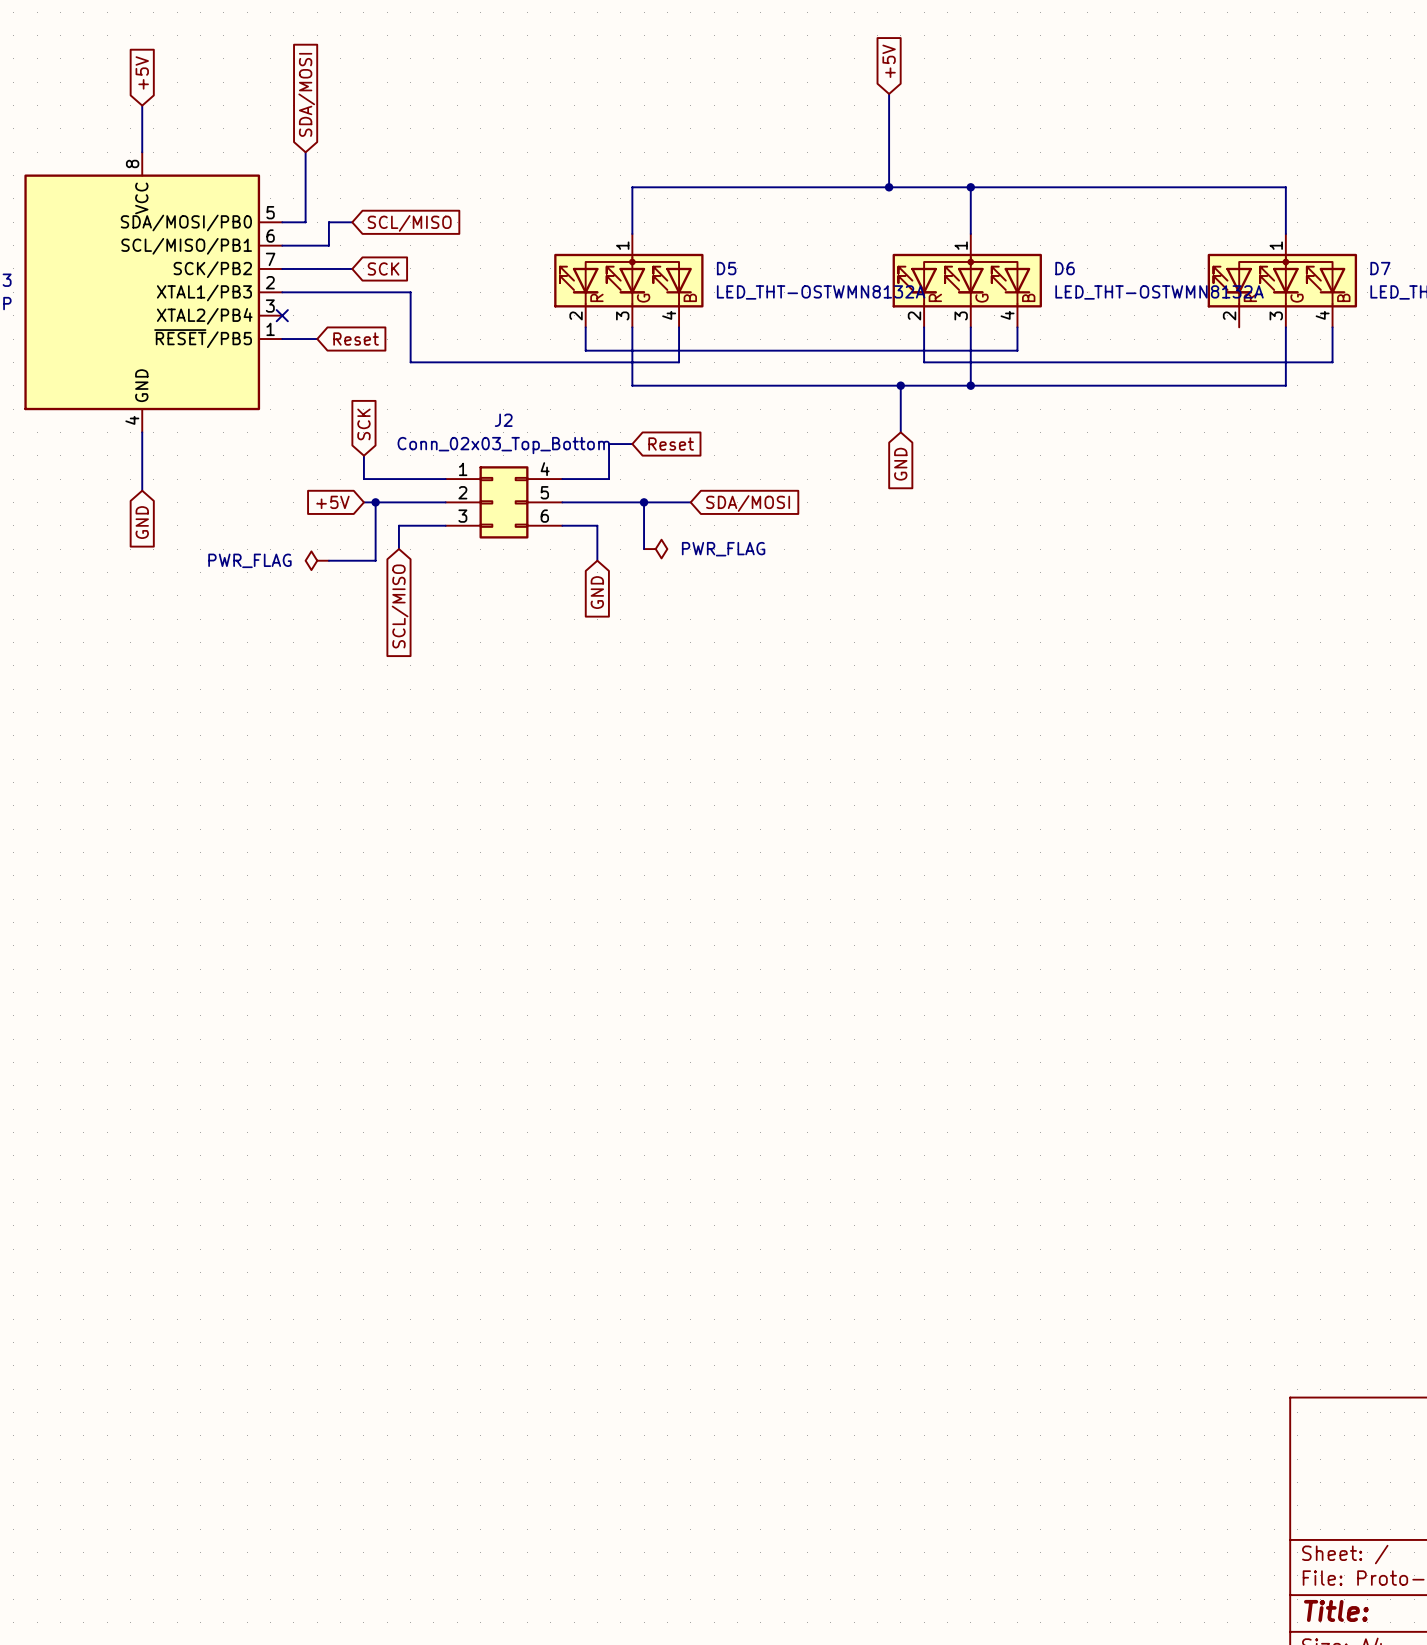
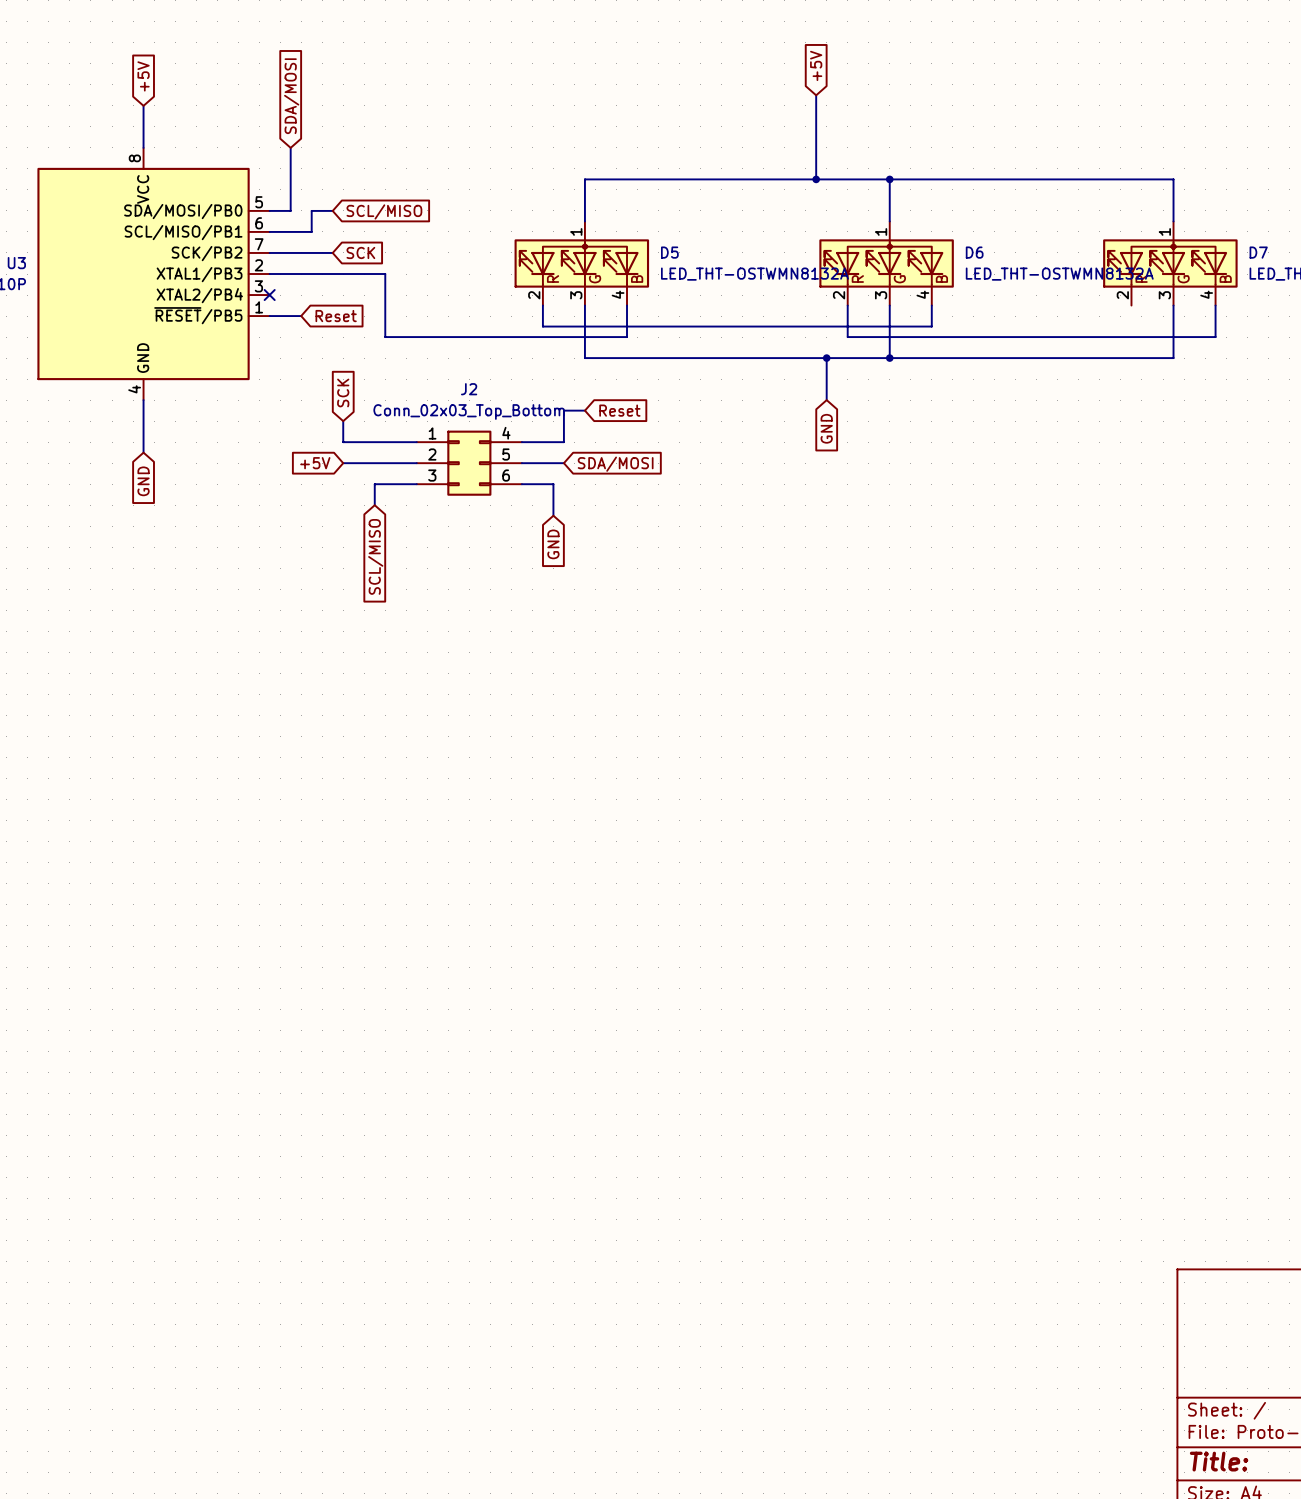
wire: (375, 502) (375, 560) (328, 560) -> none
junction: (375, 502) -> none
wire: (609, 502) (690, 502) -> none
wire: (644, 502) (644, 549) -> none
junction: (644, 502) -> none
global label position: SDA/MOSI (748, 503) -> SDA/MOSI (615, 464)
power symbol: PWR_FLAG (655, 549) -> none
power symbol: PWR_FLAG (317, 560) -> none

